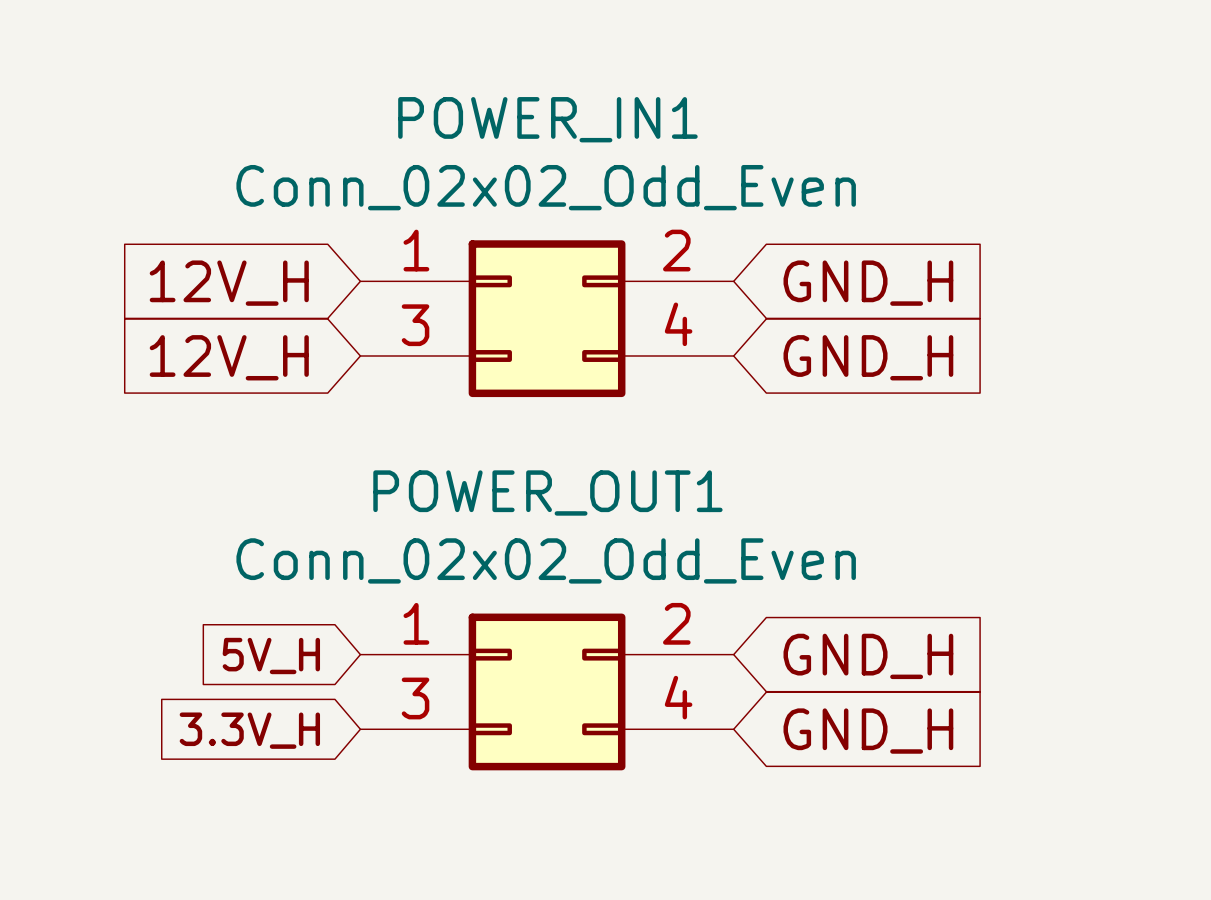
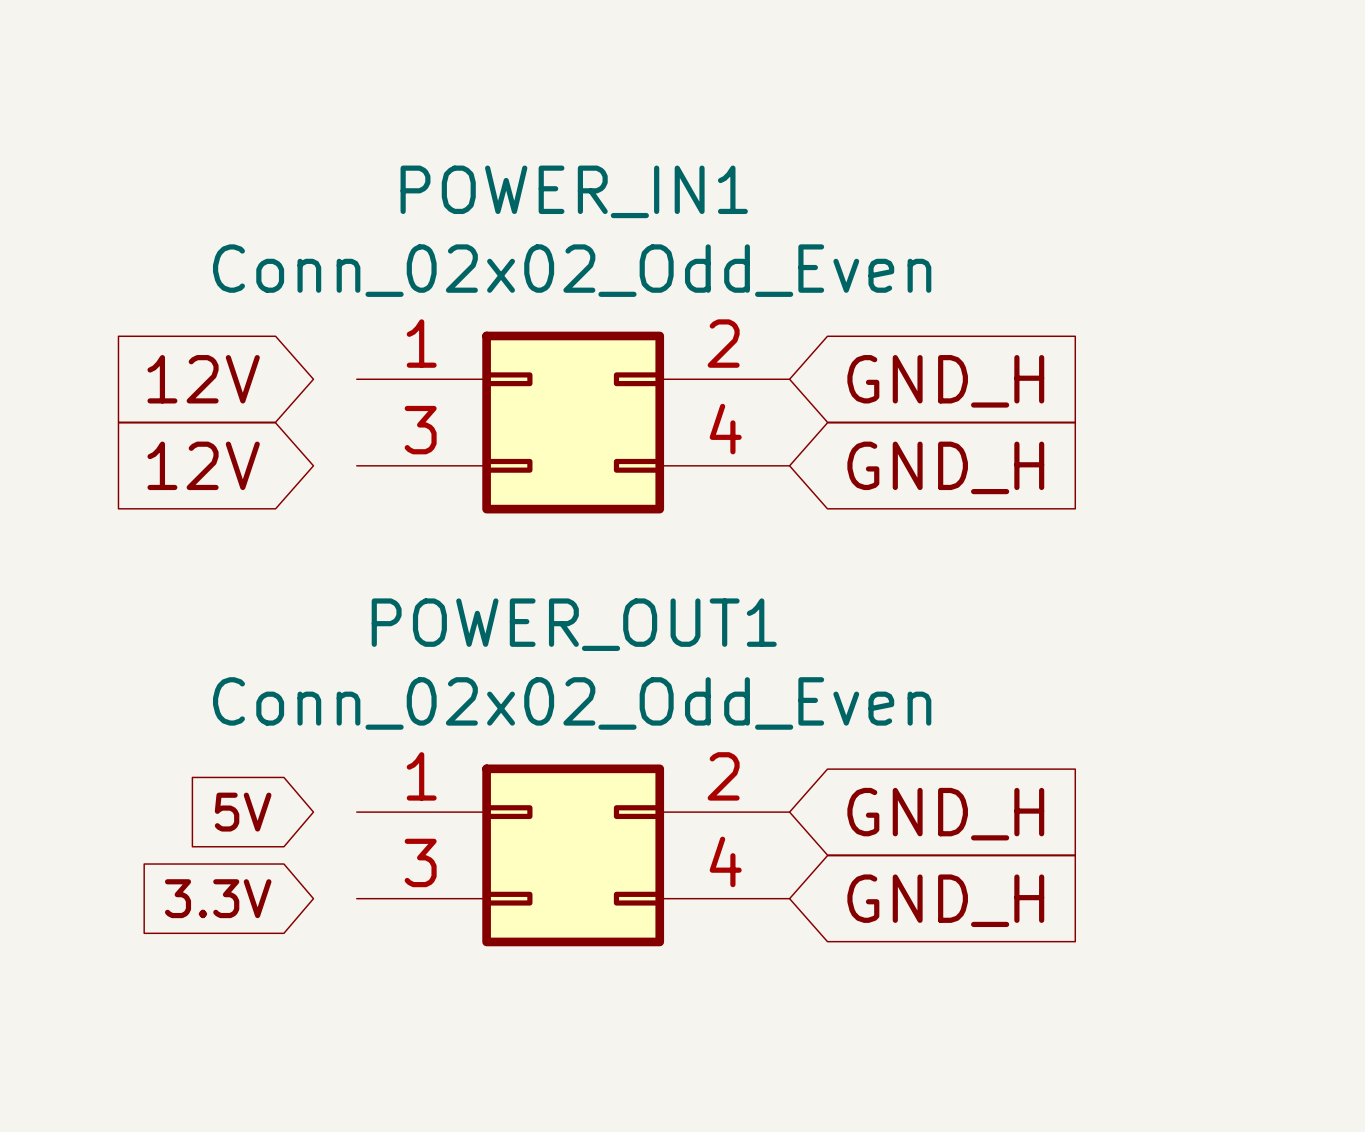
global label: 12V_H (229, 283) -> 12V (203, 379)
global label: 12V_H (229, 357) -> 12V (203, 465)
global label: 5V_H (271, 656) -> 5V (243, 812)
global label: 3.3V_H (249, 730) -> 3.3V (218, 898)

